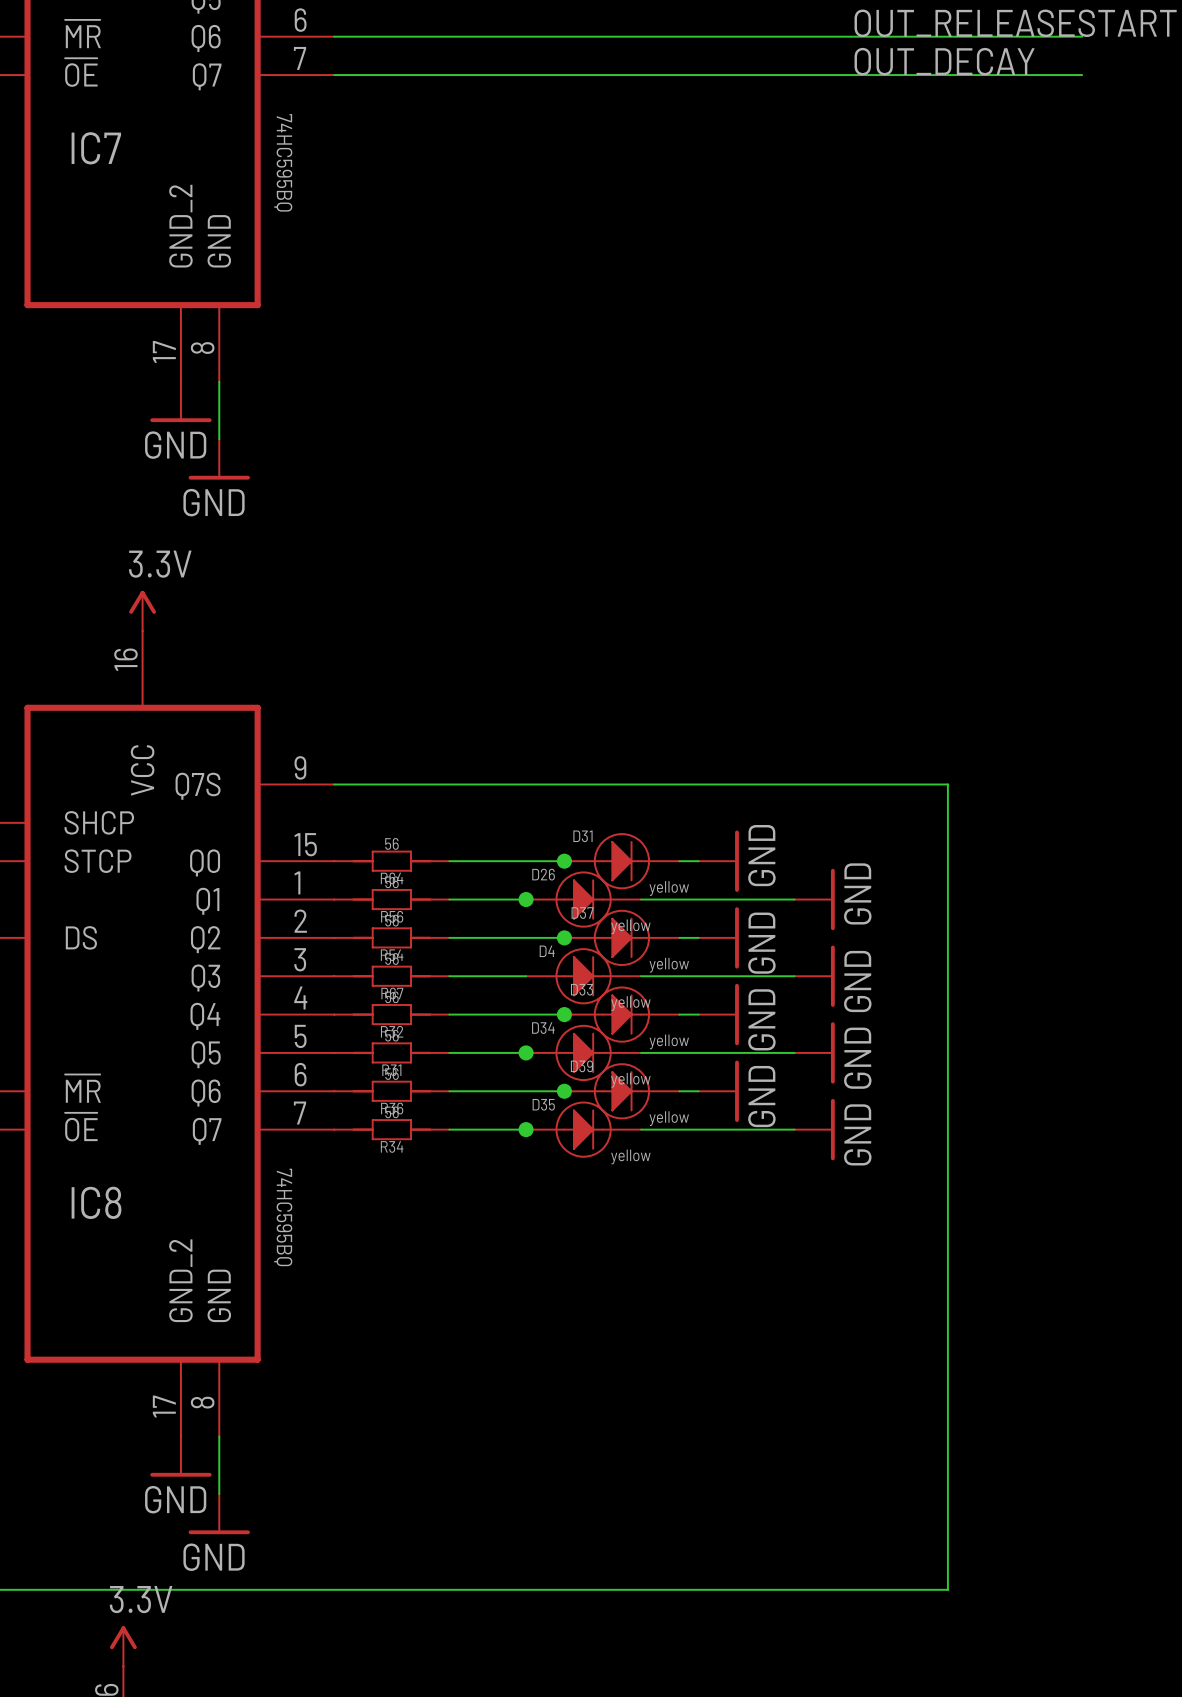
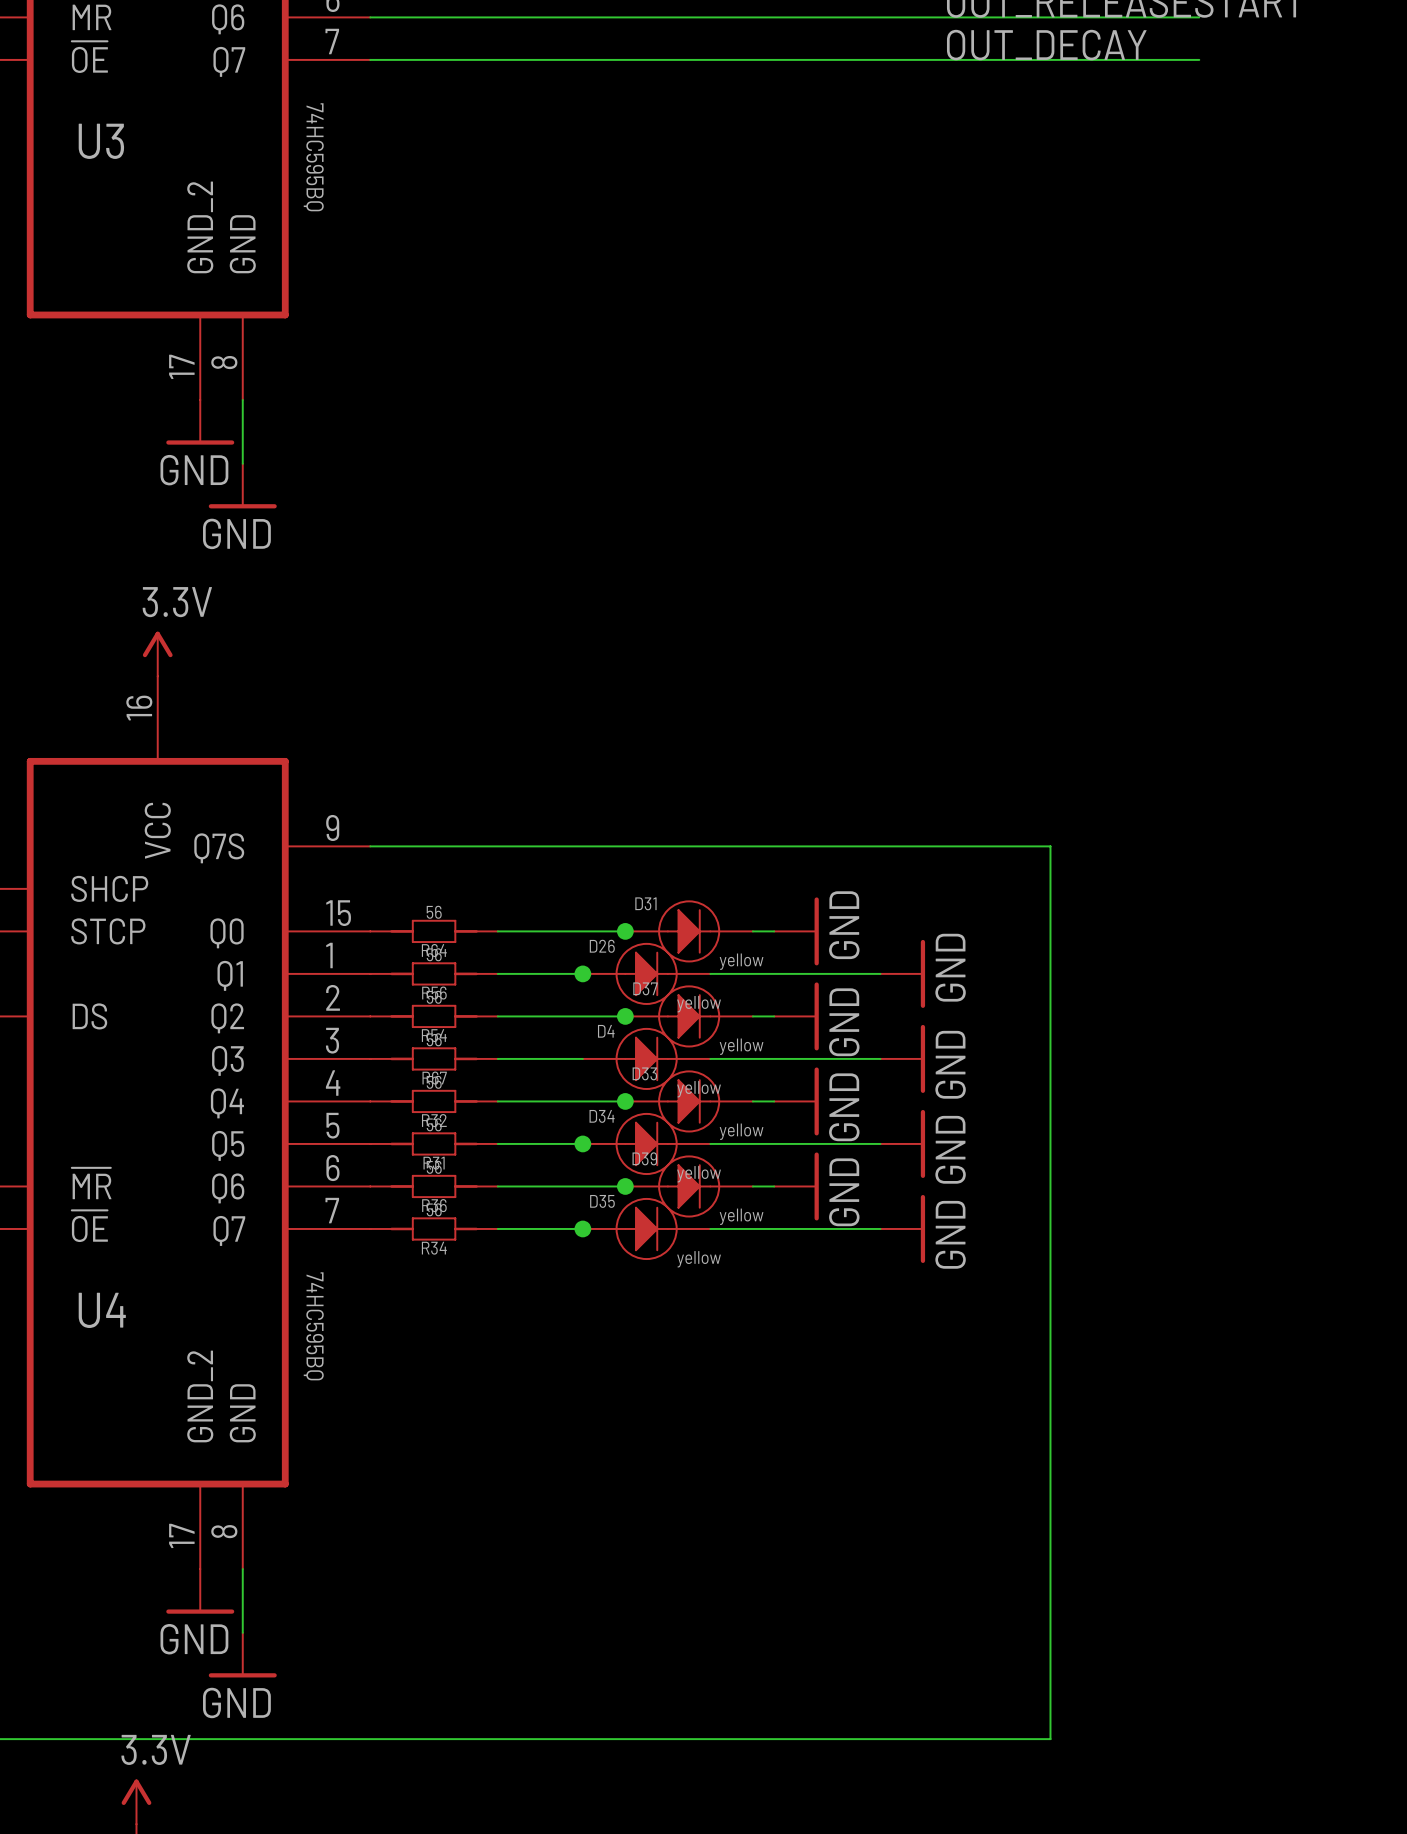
IC7 name: IC7 (96, 148) -> U3 (101, 141)
IC8 name: IC8 (96, 1202) -> U4 (102, 1310)

